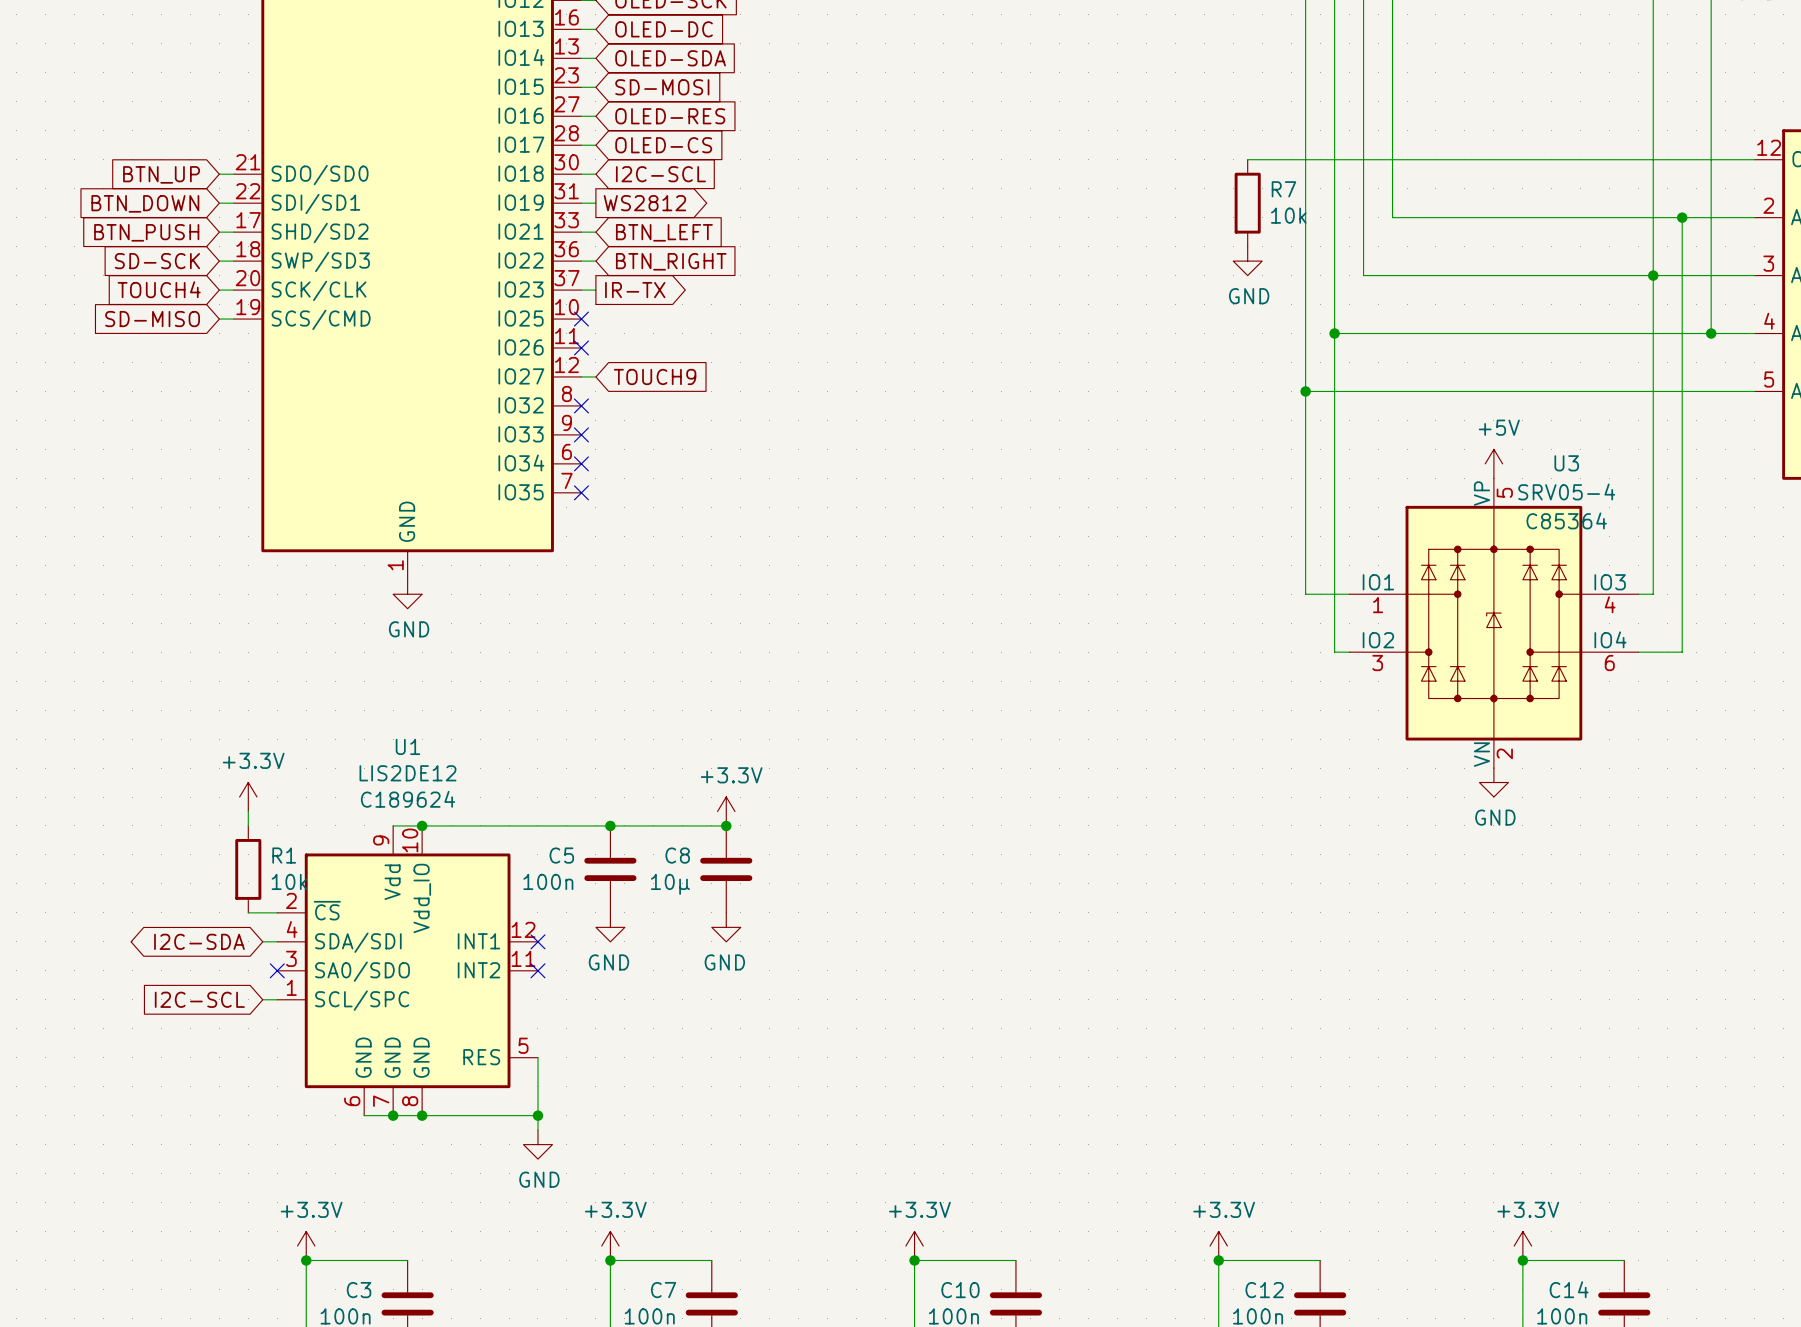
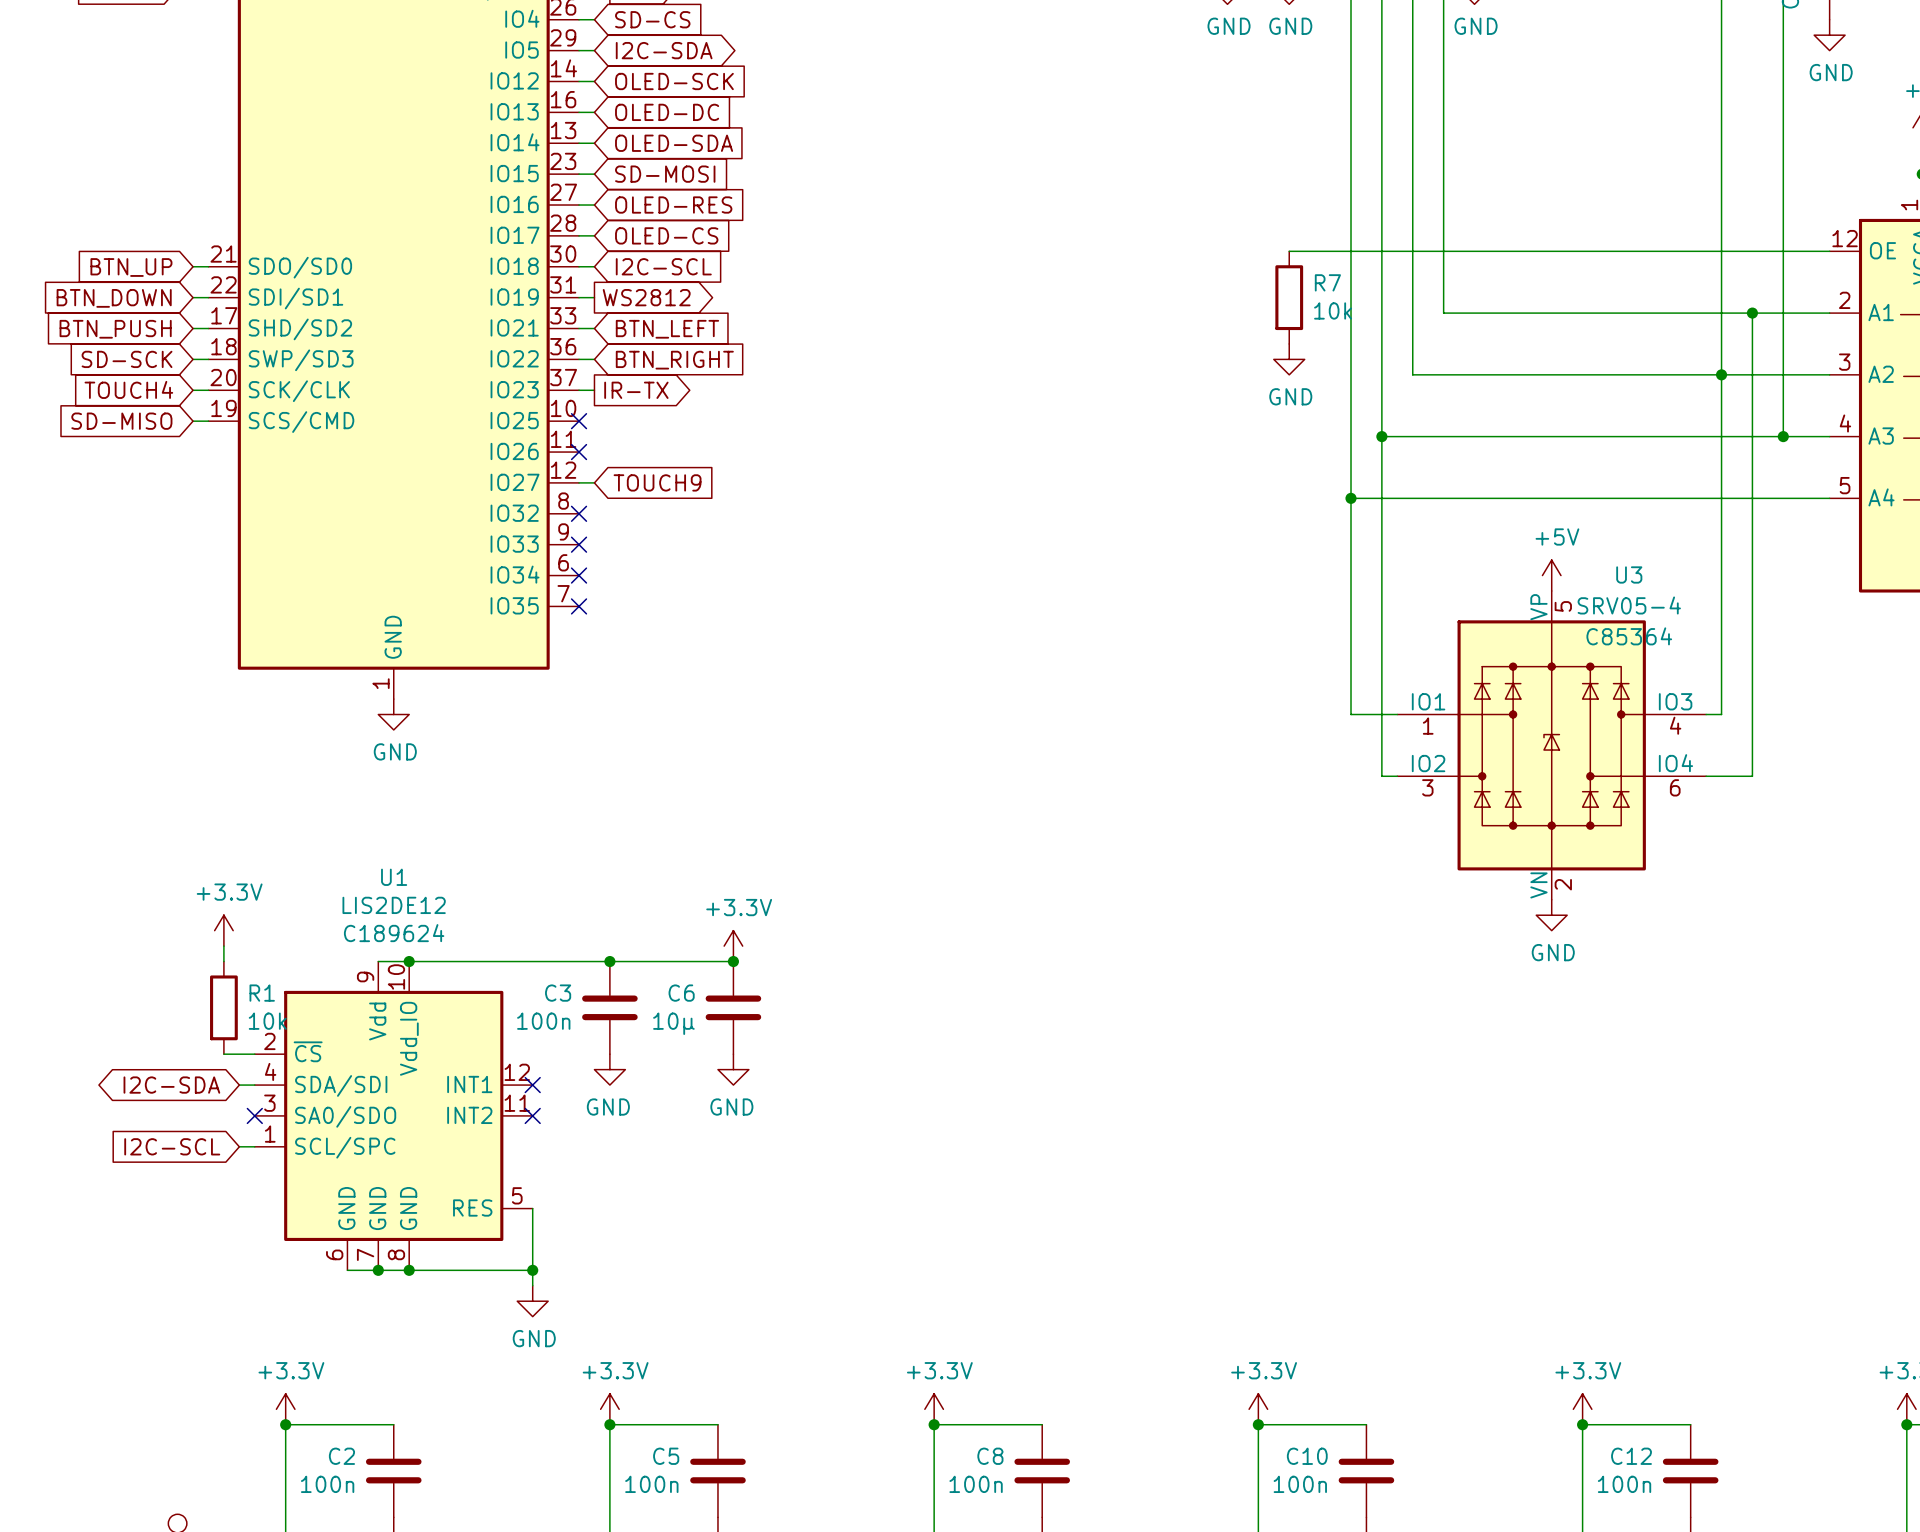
C5 name: C5 (561, 855) -> C3 (558, 993)
C8 name: C8 (677, 855) -> C6 (681, 993)
C14 name: C14 (1569, 1289) -> C12 (1631, 1456)
C3 name: C3 (359, 1290) -> C2 (341, 1456)
C7 name: C7 (663, 1290) -> C5 (666, 1456)
C10 name: C10 (960, 1290) -> C8 (990, 1456)
C12 name: C12 (1264, 1290) -> C10 (1307, 1456)

